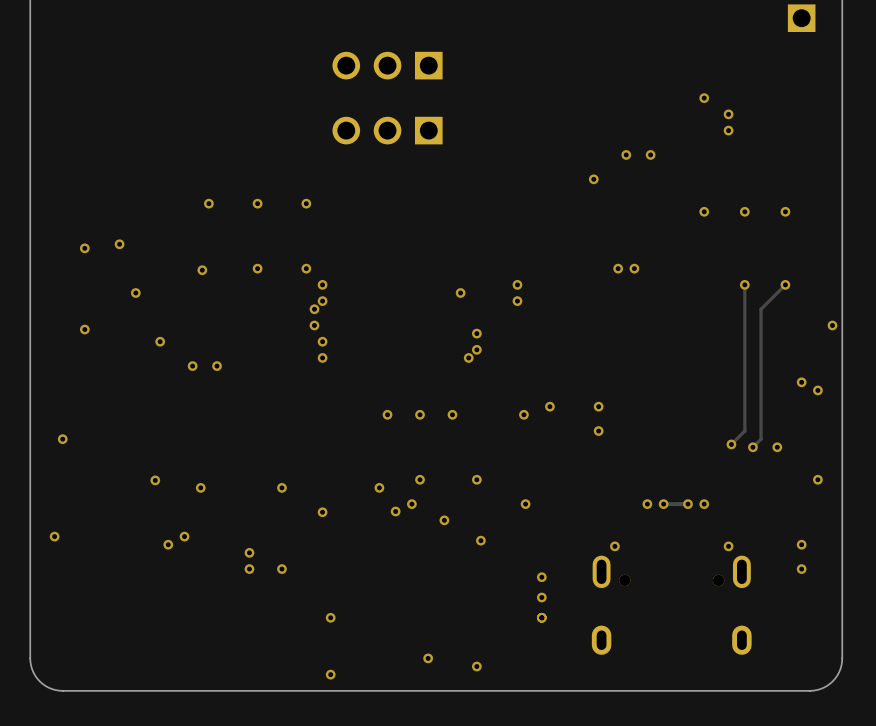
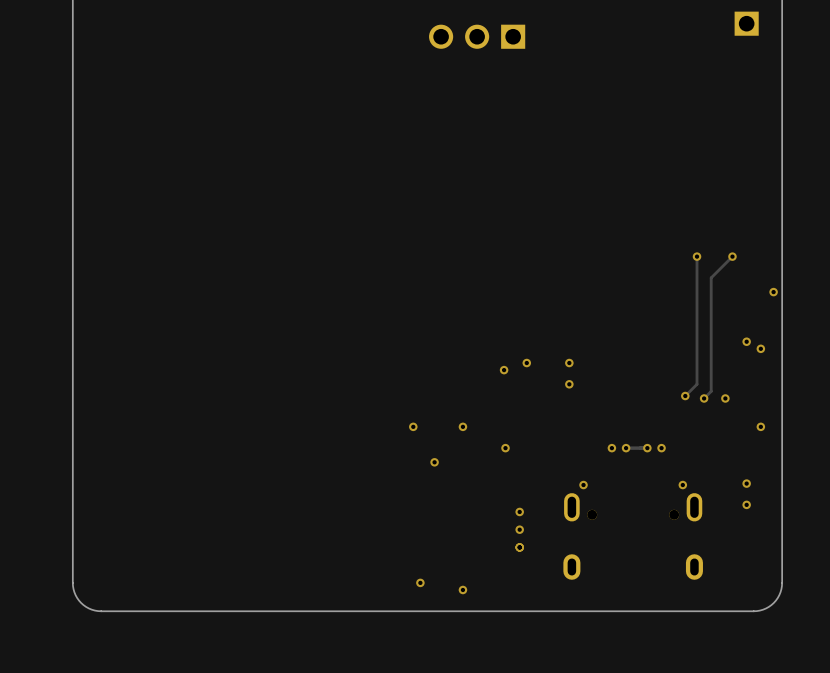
part: none -> (477, 36)
part: (387, 65) -> none
via: (704, 98) -> none
via: (728, 114) -> none
part: (387, 130) -> none
via: (728, 130) -> none
via: (626, 154) -> none
via: (650, 154) -> none
via: (593, 179) -> none
via: (208, 203) -> none
via: (257, 203) -> none
via: (306, 203) -> none
via: (704, 211) -> none
via: (744, 211) -> none
via: (785, 211) -> none
via: (119, 244) -> none
via: (84, 248) -> none
via: (257, 268) -> none
via: (306, 268) -> none
via: (618, 268) -> none
via: (634, 268) -> none
via: (202, 270) -> none
via: (322, 284) -> none
via: (517, 284) -> none
via: (135, 292) -> none
via: (460, 292) -> none
via: (322, 301) -> none
via: (517, 301) -> none
via: (314, 309) -> none
via: (314, 325) -> none
via: (84, 329) -> none
via: (476, 333) -> none
via: (160, 341) -> none
via: (322, 341) -> none
via: (476, 349) -> none
via: (322, 357) -> none
via: (468, 357) -> none
via: (192, 366) -> none
via: (217, 366) -> none
via: (387, 414) -> none
via: (420, 414) -> none
via: (452, 414) -> none
via: (62, 439) -> none
via: (155, 480) -> none
via: (200, 487) -> none
via: (281, 487) -> none
via: (379, 487) -> none
via: (411, 504) -> none
via: (395, 511) -> none
via: (322, 512) -> none
via: (54, 536) -> none
via: (184, 536) -> none
via: (480, 540) -> none
via: (168, 544) -> none
via: (249, 552) -> none
via: (249, 569) -> none
via: (281, 569) -> none
via: (330, 617) -> none
via: (330, 674) -> none

